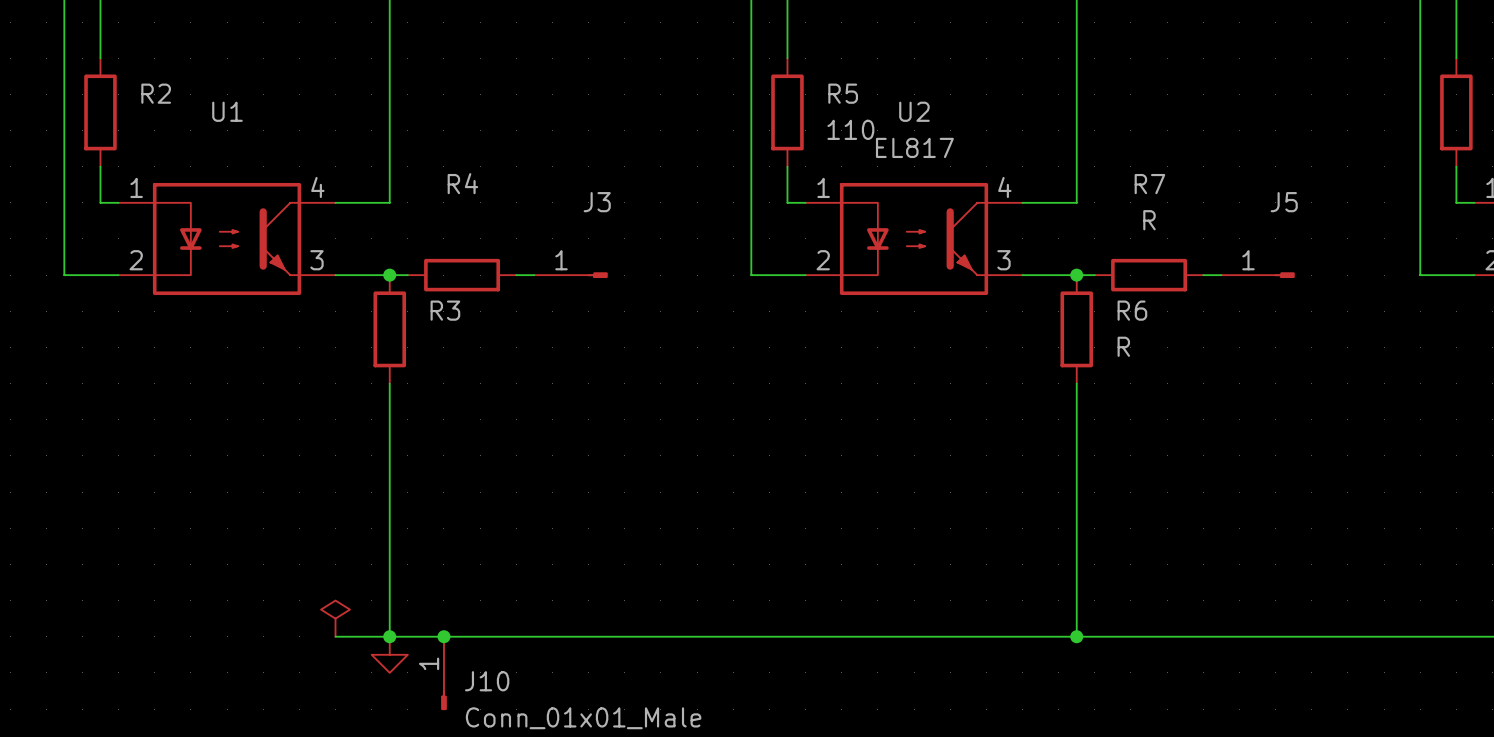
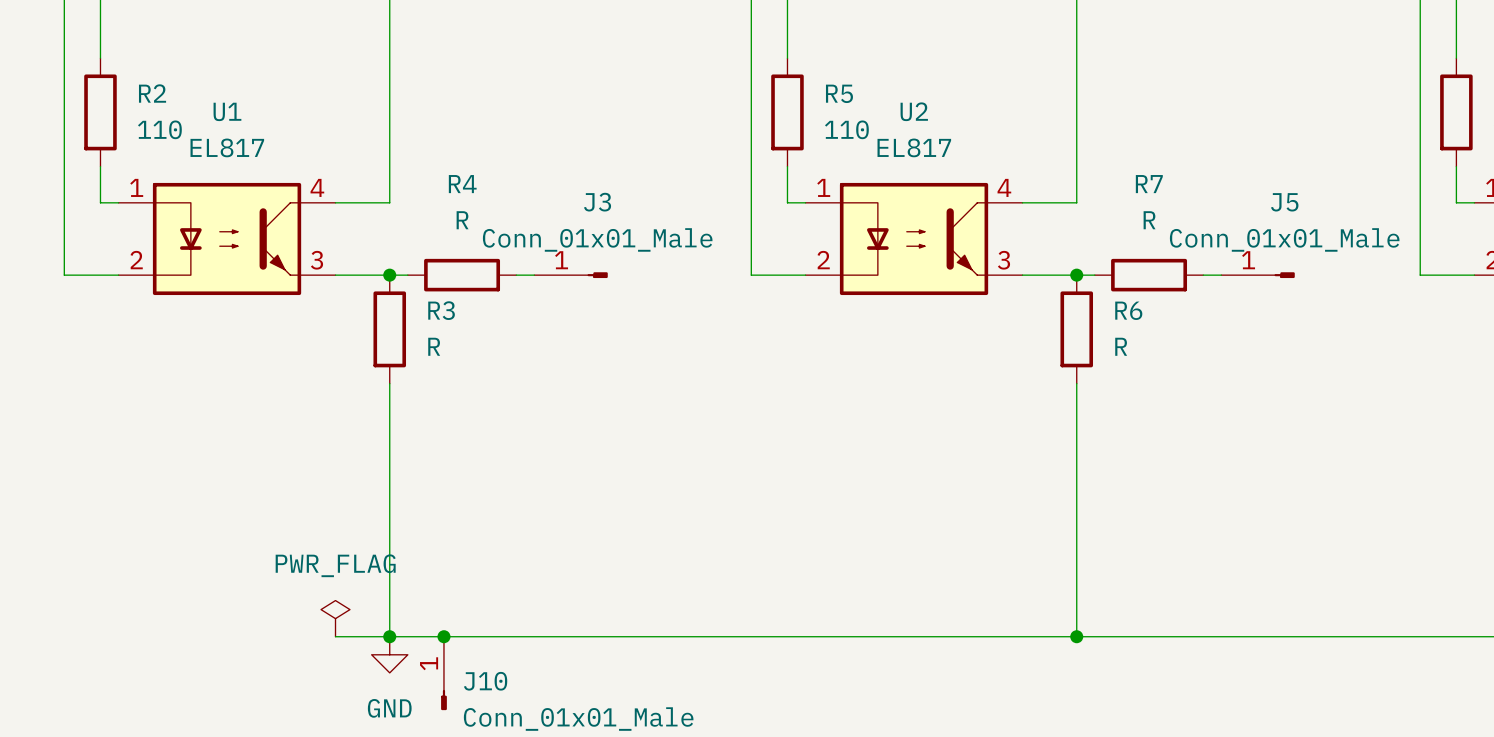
R2 value: none -> 110 (159, 129)
U1 value: none -> EL817 (227, 147)
R4 value: none -> R (462, 220)
J3 value: none -> Conn_01x01_Male (597, 239)
J5 value: none -> Conn_01x01_Male (1284, 239)
R3 value: none -> R (434, 346)
power symbol text: none -> PWR_FLAG (335, 565)
power symbol text: none -> GND (389, 708)

